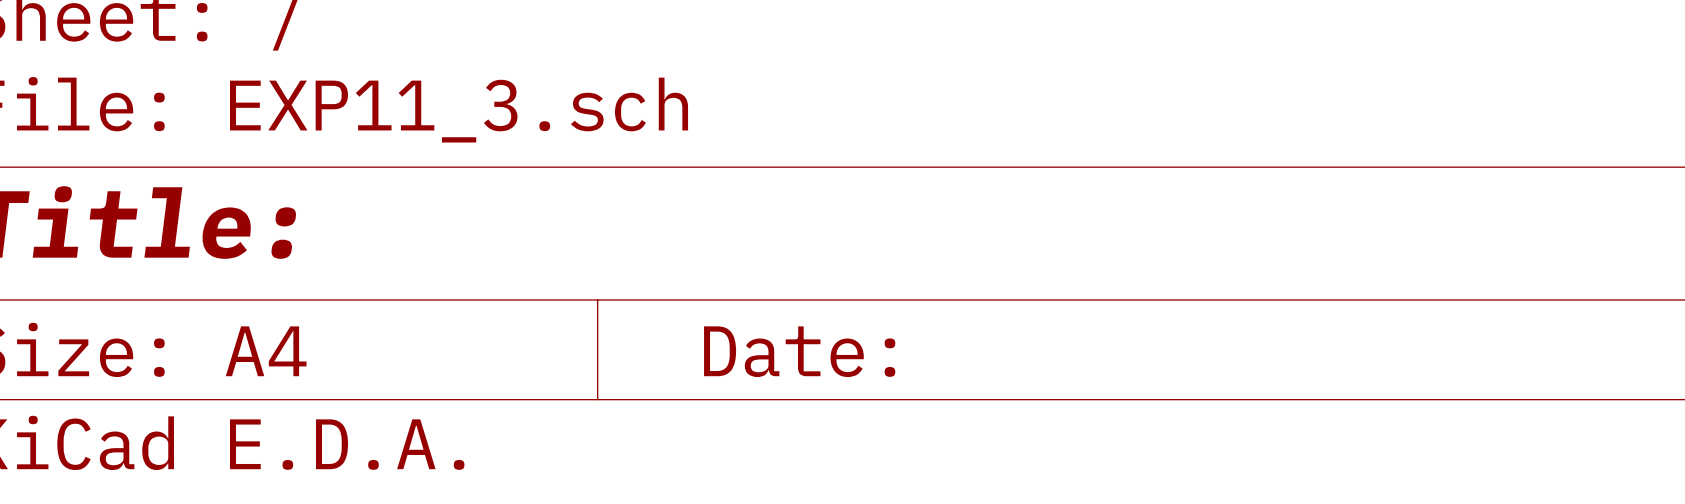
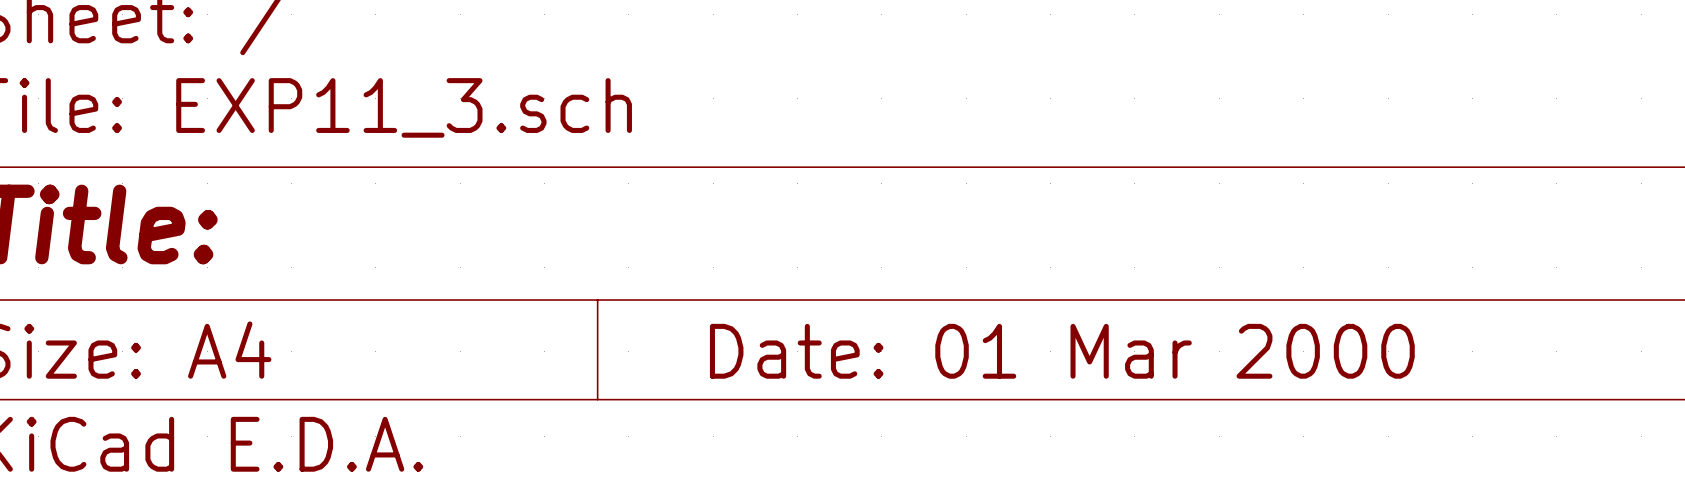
title block: Date: (799, 351) -> Date: 01 Mar 2000 (1062, 351)

